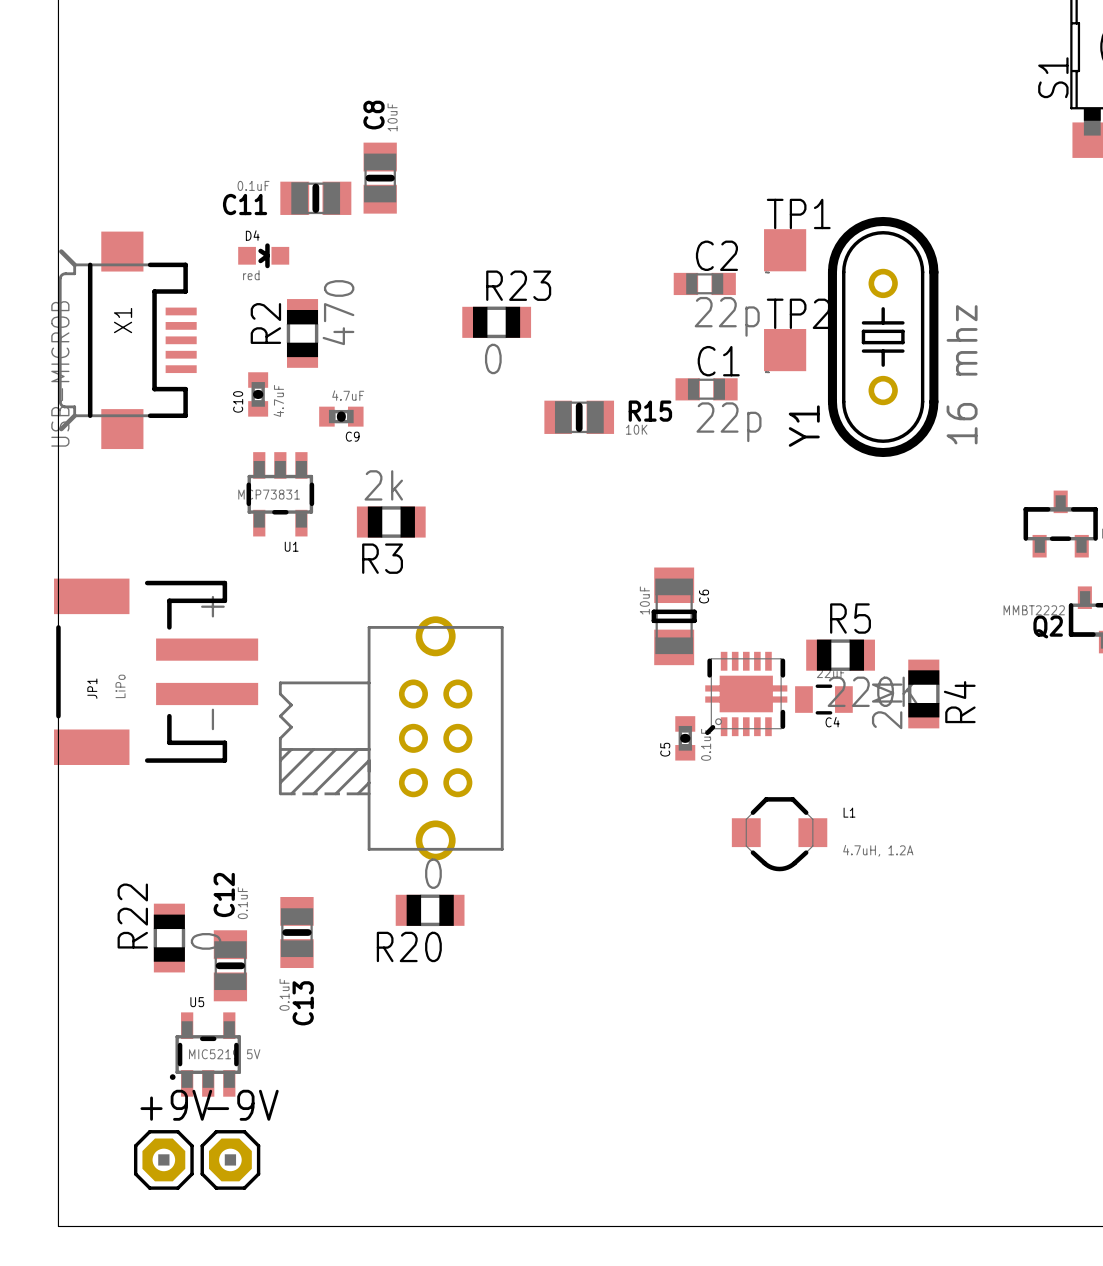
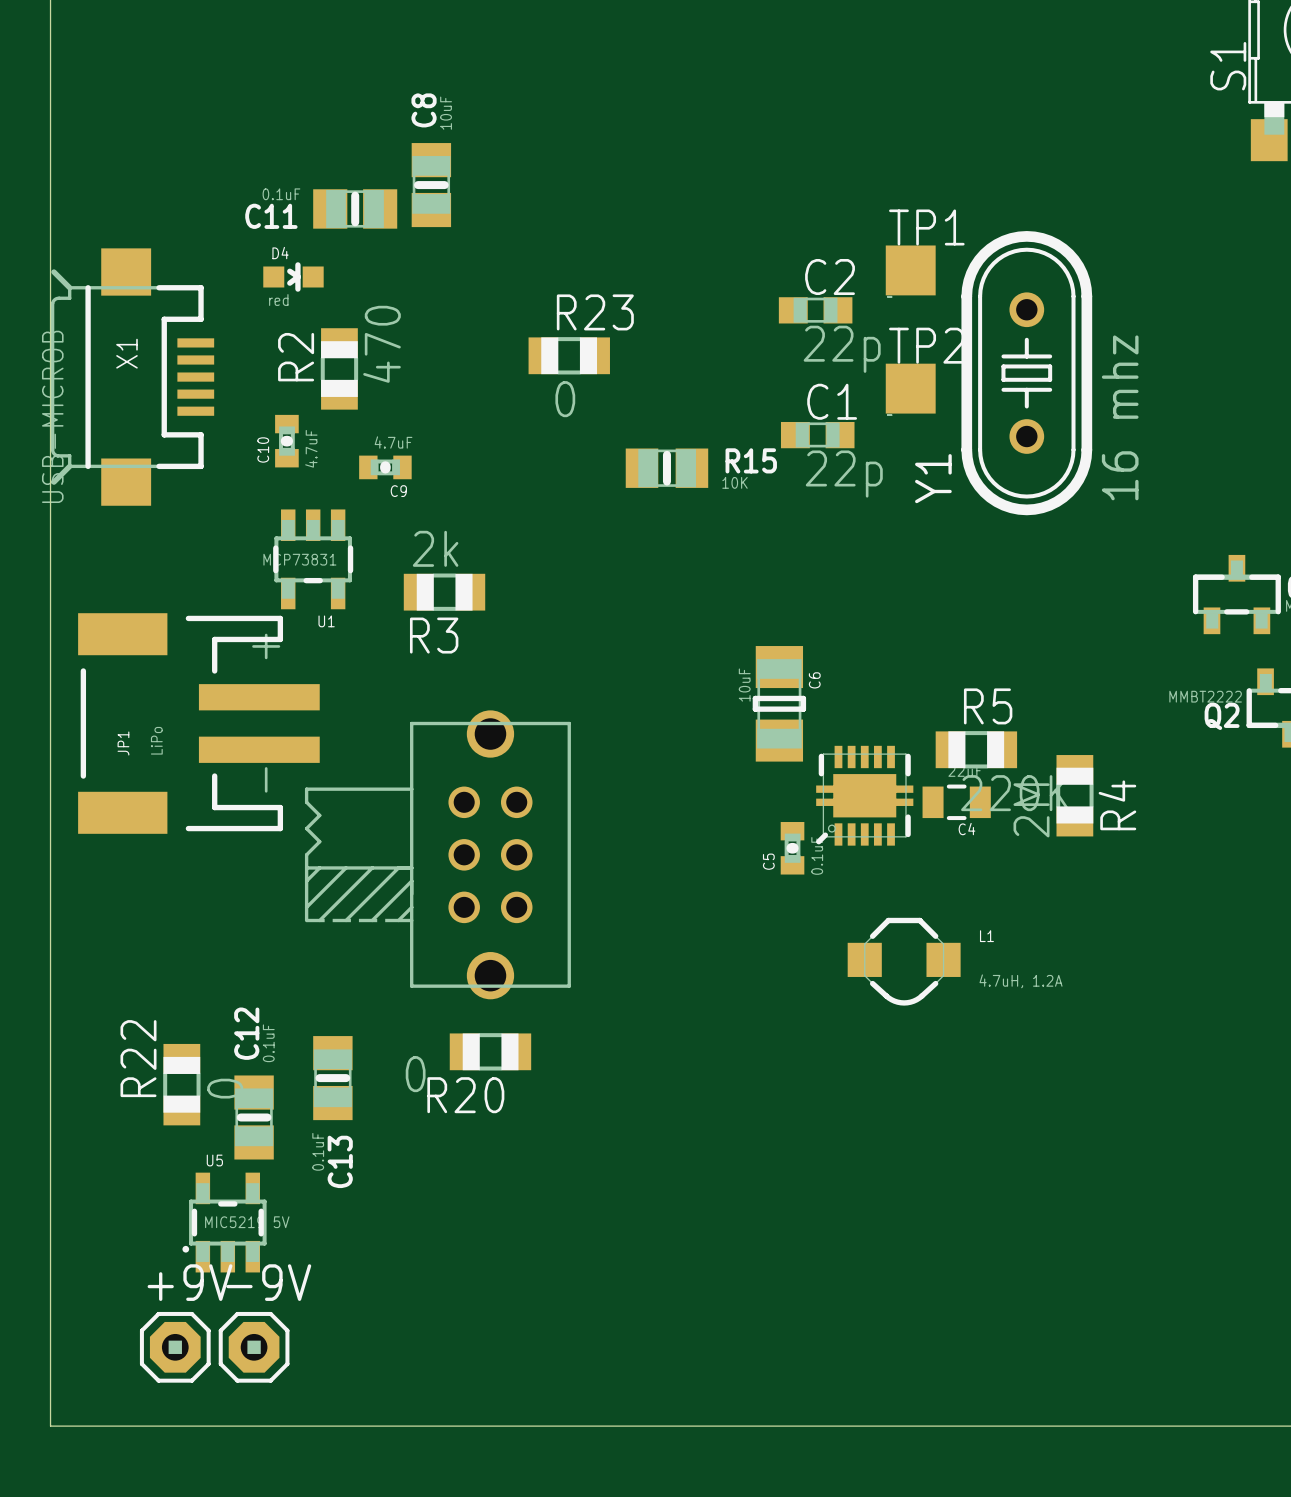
part footprint: [278, 616, 504, 861] -> [304, 710, 571, 1000]
JP1 position: (156, 671) -> (198, 723)
R20 value position: 0 (433, 873) -> 0 (415, 1074)

